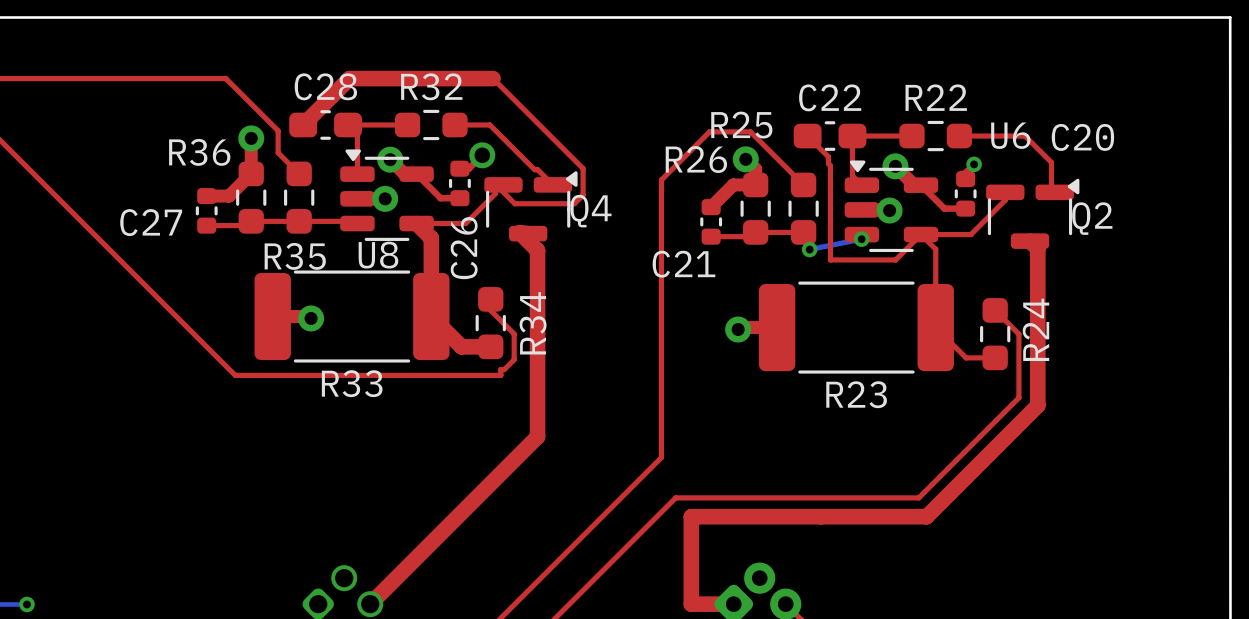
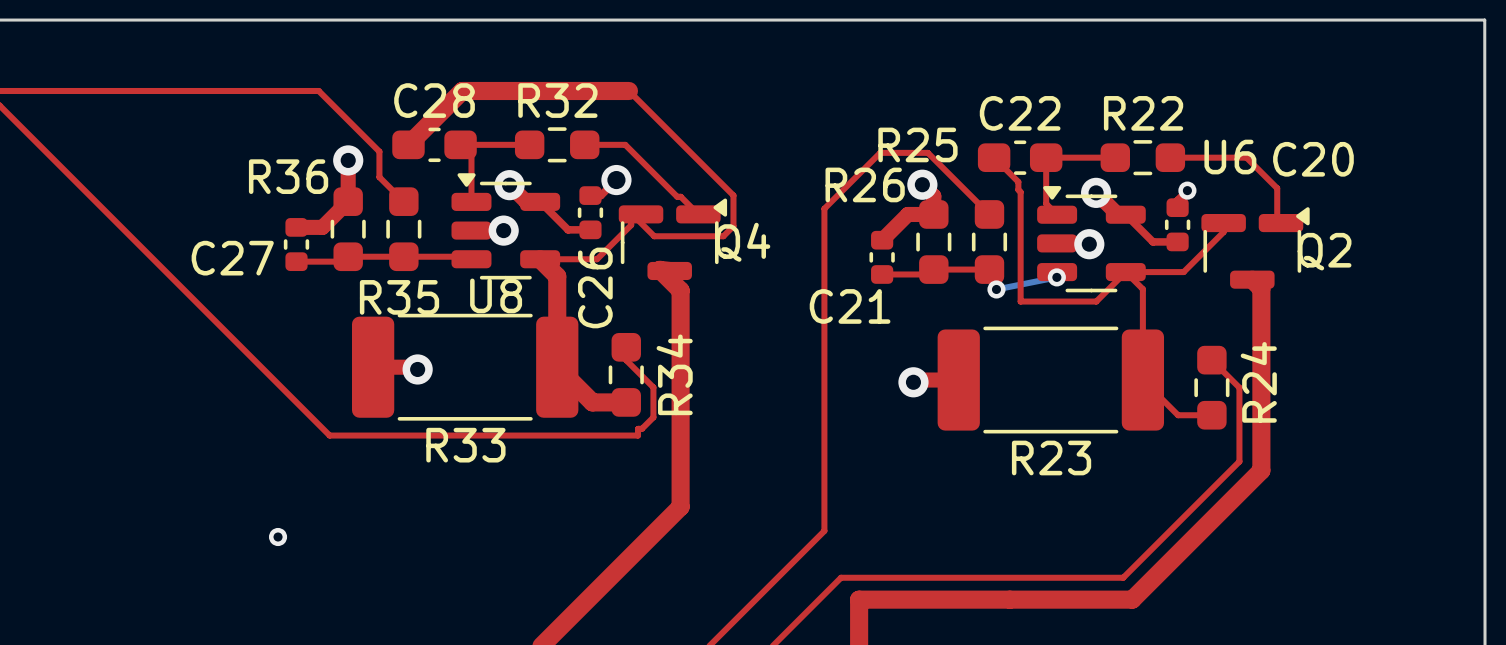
via: none -> (278, 537)

